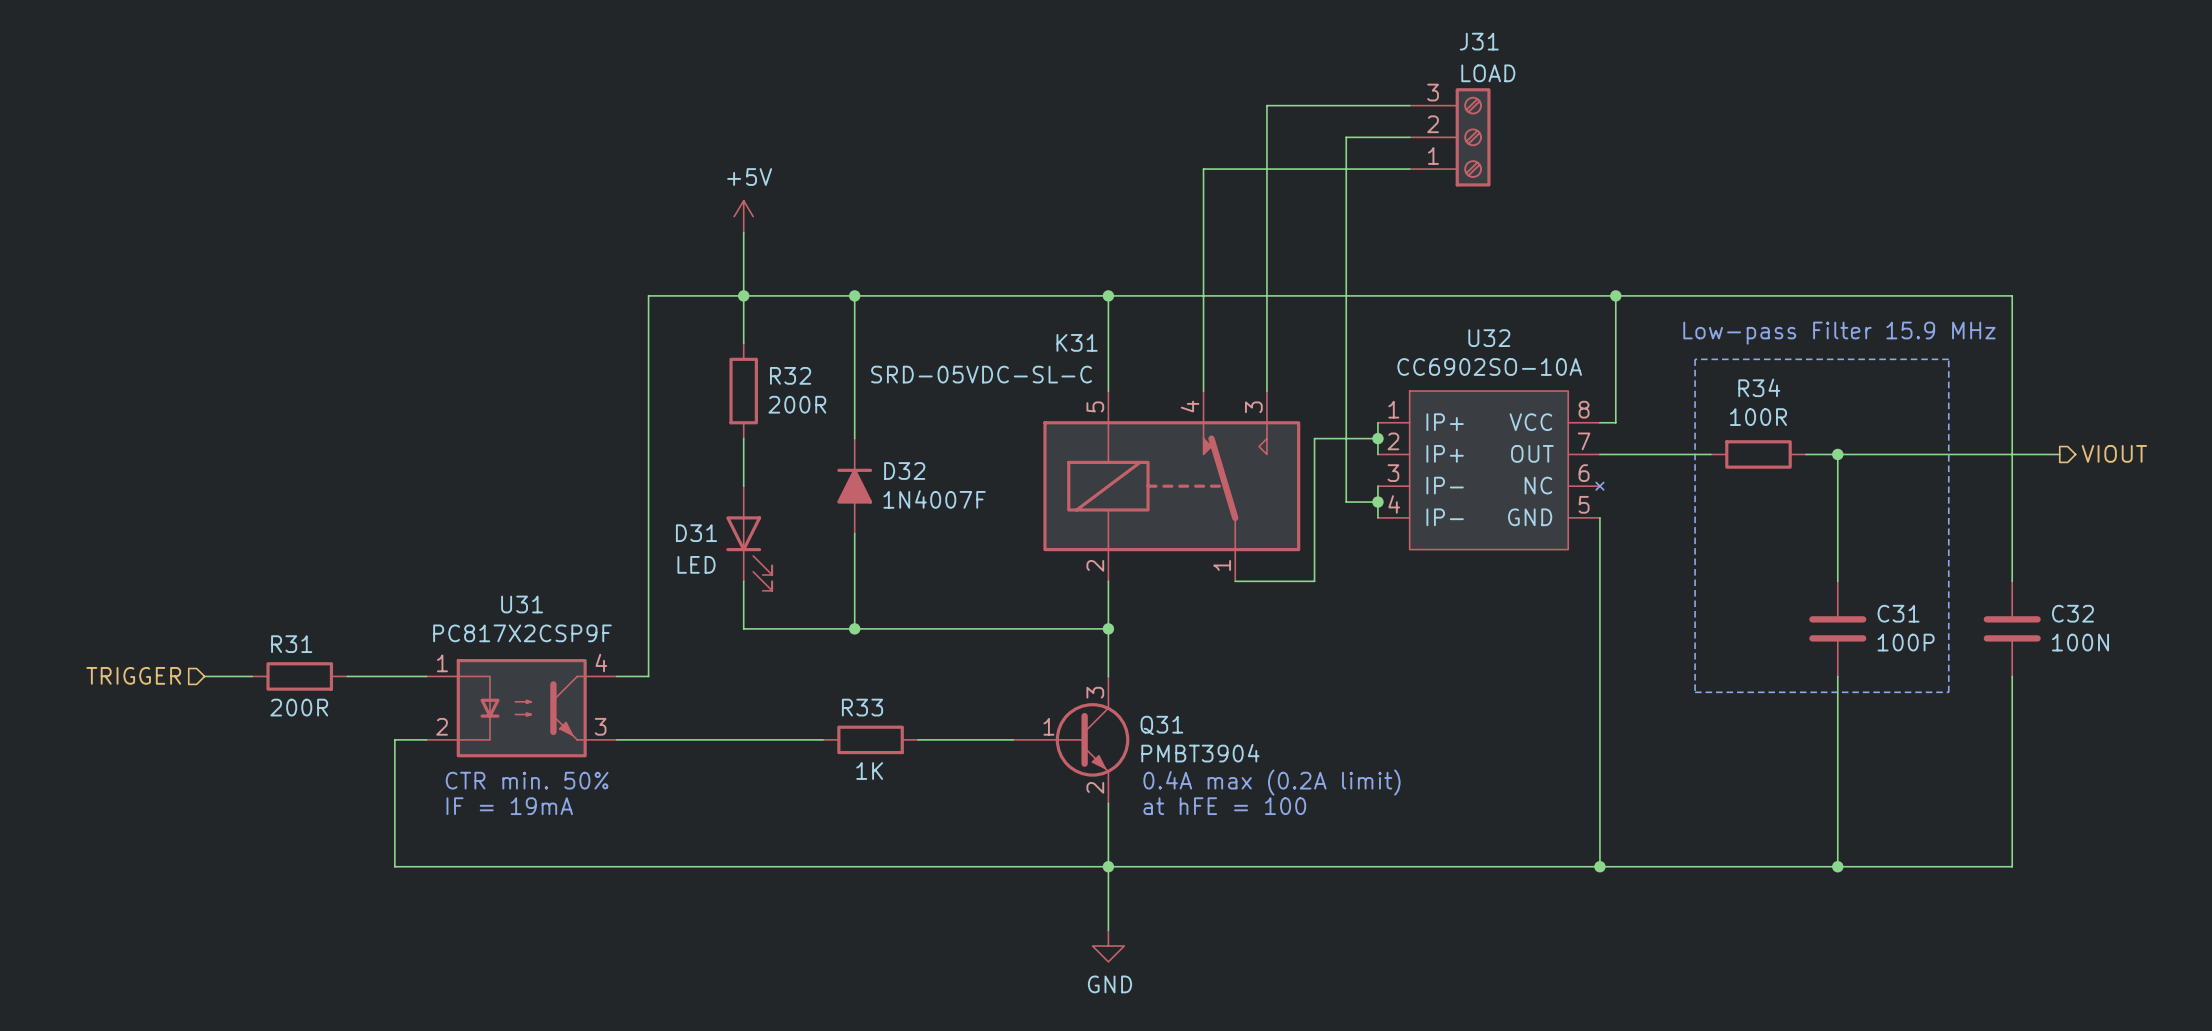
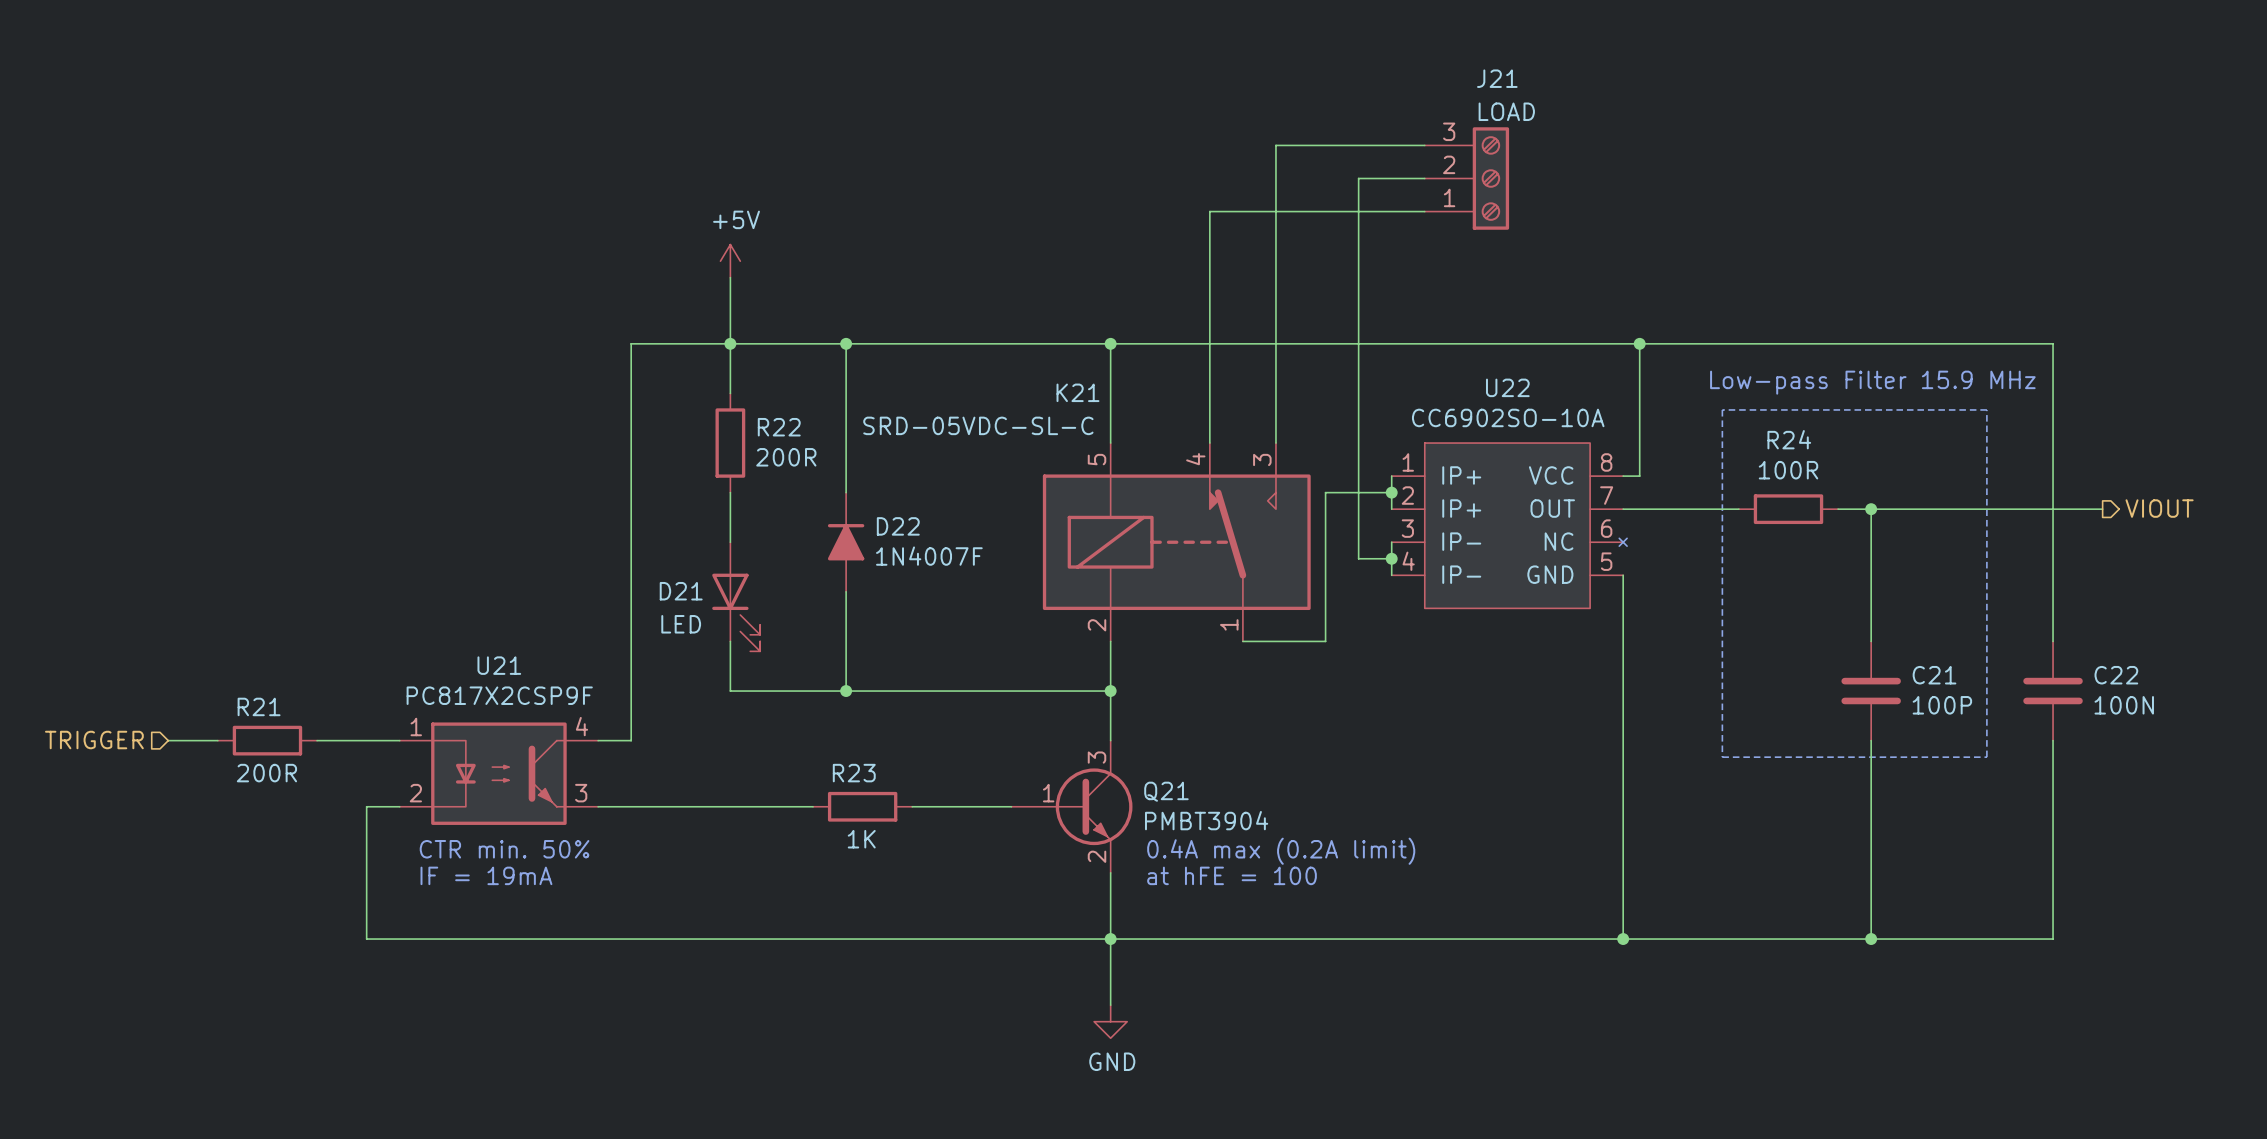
J31 name: J31 (1479, 41) -> J21 (1497, 78)
U32 name: U32 (1489, 338) -> U22 (1507, 387)
K31 name: K31 (1077, 342) -> K21 (1077, 392)
R32 name: R32 (790, 375) -> R22 (779, 427)
R34 name: R34 (1759, 387) -> R24 (1789, 439)
D32 name: D32 (904, 471) -> D22 (898, 526)
D31 name: D31 (696, 533) -> D21 (681, 591)
U31 name: U31 (522, 604) -> U21 (499, 665)
C31 name: C31 (1898, 613) -> C21 (1934, 675)
C32 name: C32 (2072, 613) -> C22 (2116, 675)
R31 name: R31 (291, 644) -> R21 (259, 706)
R33 name: R33 (862, 707) -> R23 (854, 773)
Q31 name: Q31 (1161, 725) -> Q21 (1166, 791)

